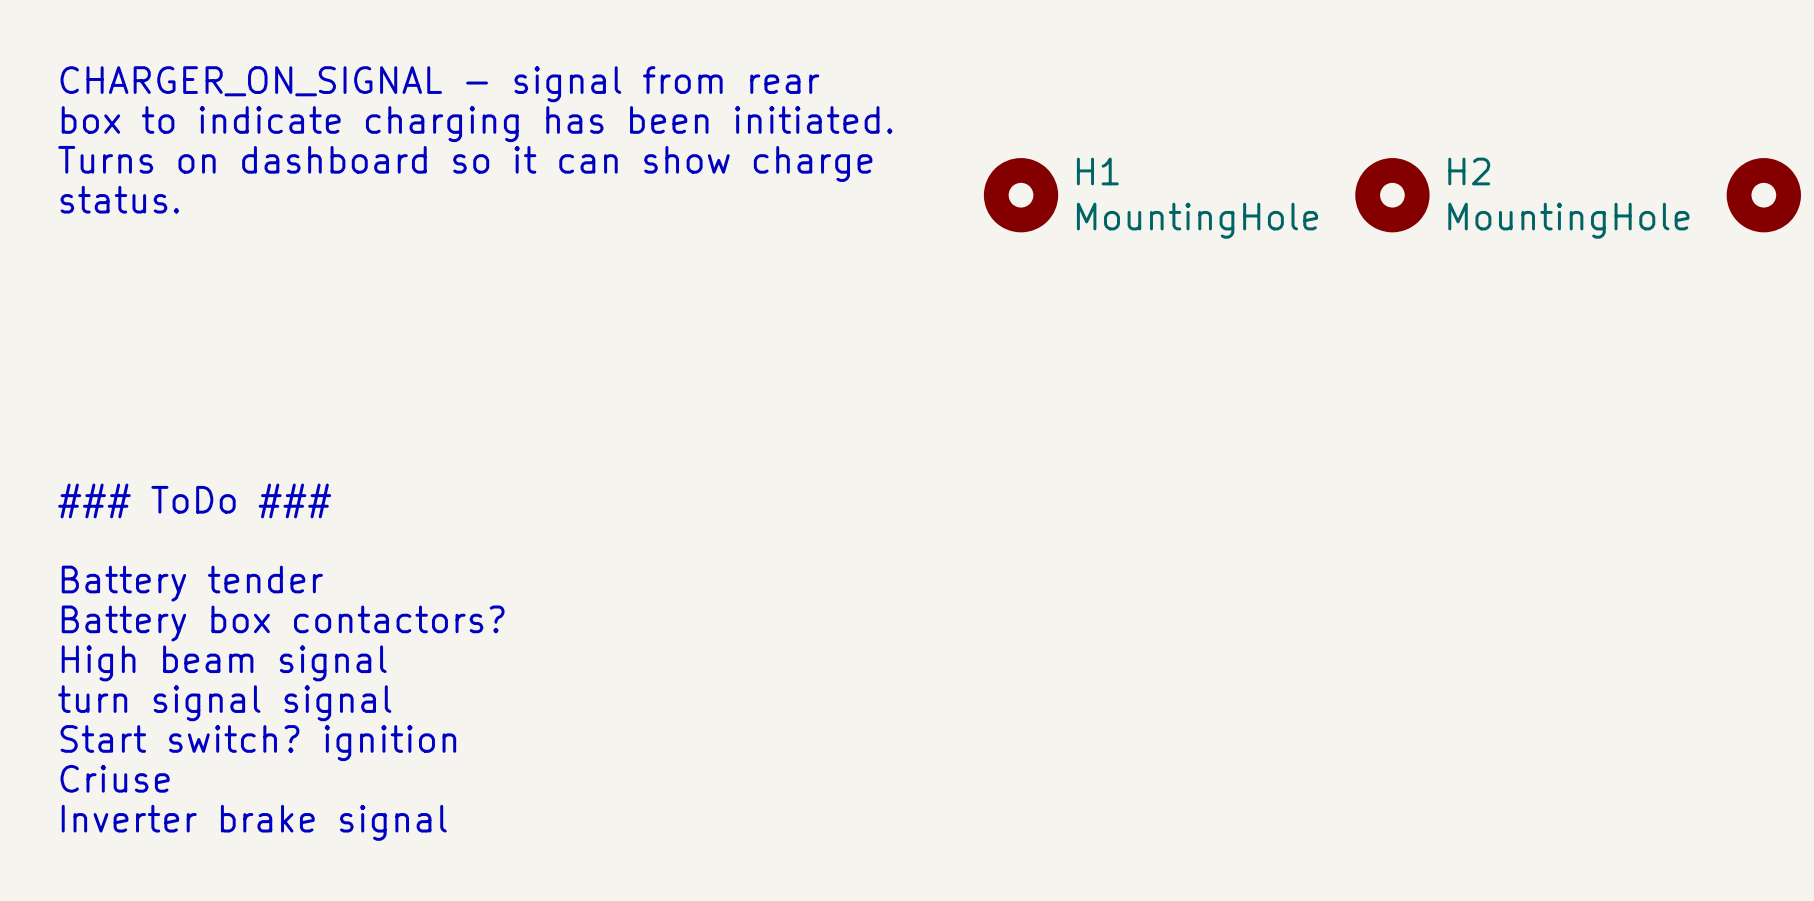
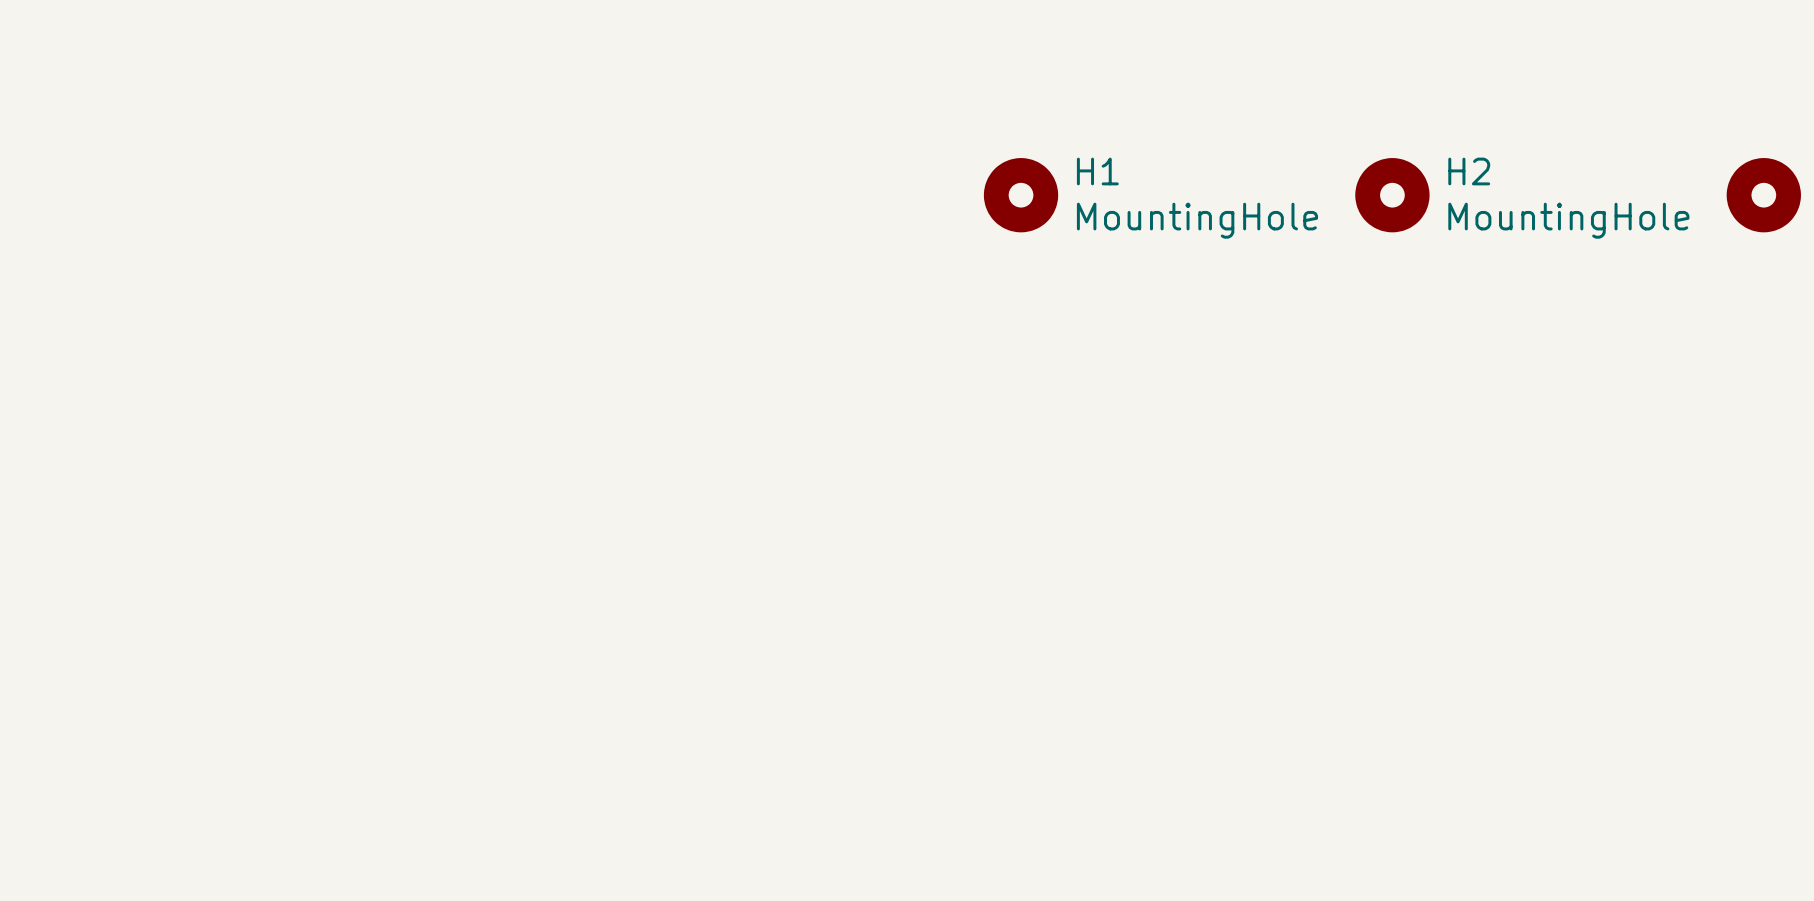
text: CHARGER_ON_SIGNAL - signal from rear (439, 84) -> none
text: box to indicate charging has been initiated. (477, 124) -> none
text: Turns on dashboard so it can show charge (465, 163) -> none
text: status. (119, 199) -> none
text: ### ToDo ### (194, 500) -> none
text: Battery tender (192, 583) -> none
text: Battery box contactors? (283, 623) -> none
text: High beam signal (224, 663) -> none
text: turn signal signal (224, 703) -> none
text: Start switch? ignition (258, 743) -> none
text: Criuse (115, 778) -> none
text: Inverter brake signal (254, 822) -> none

